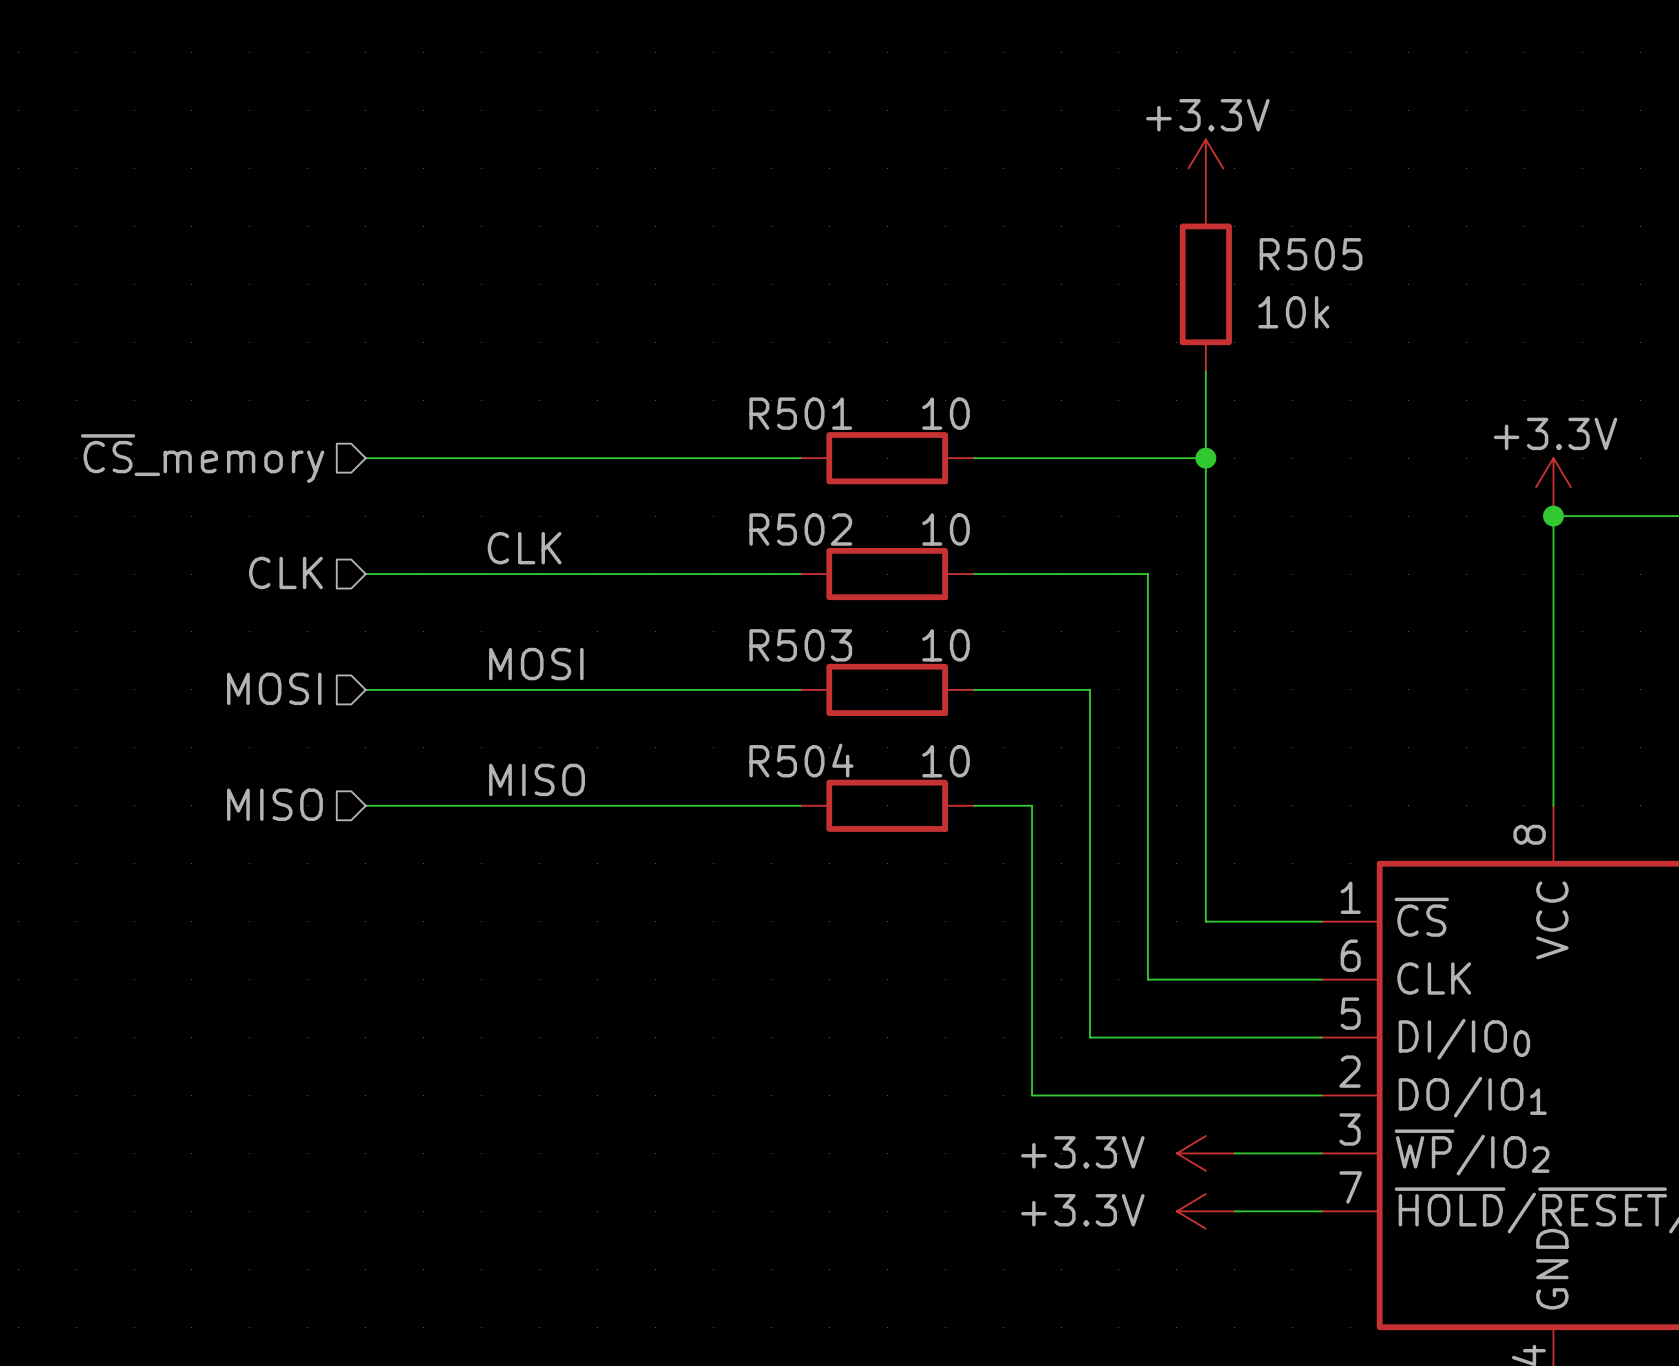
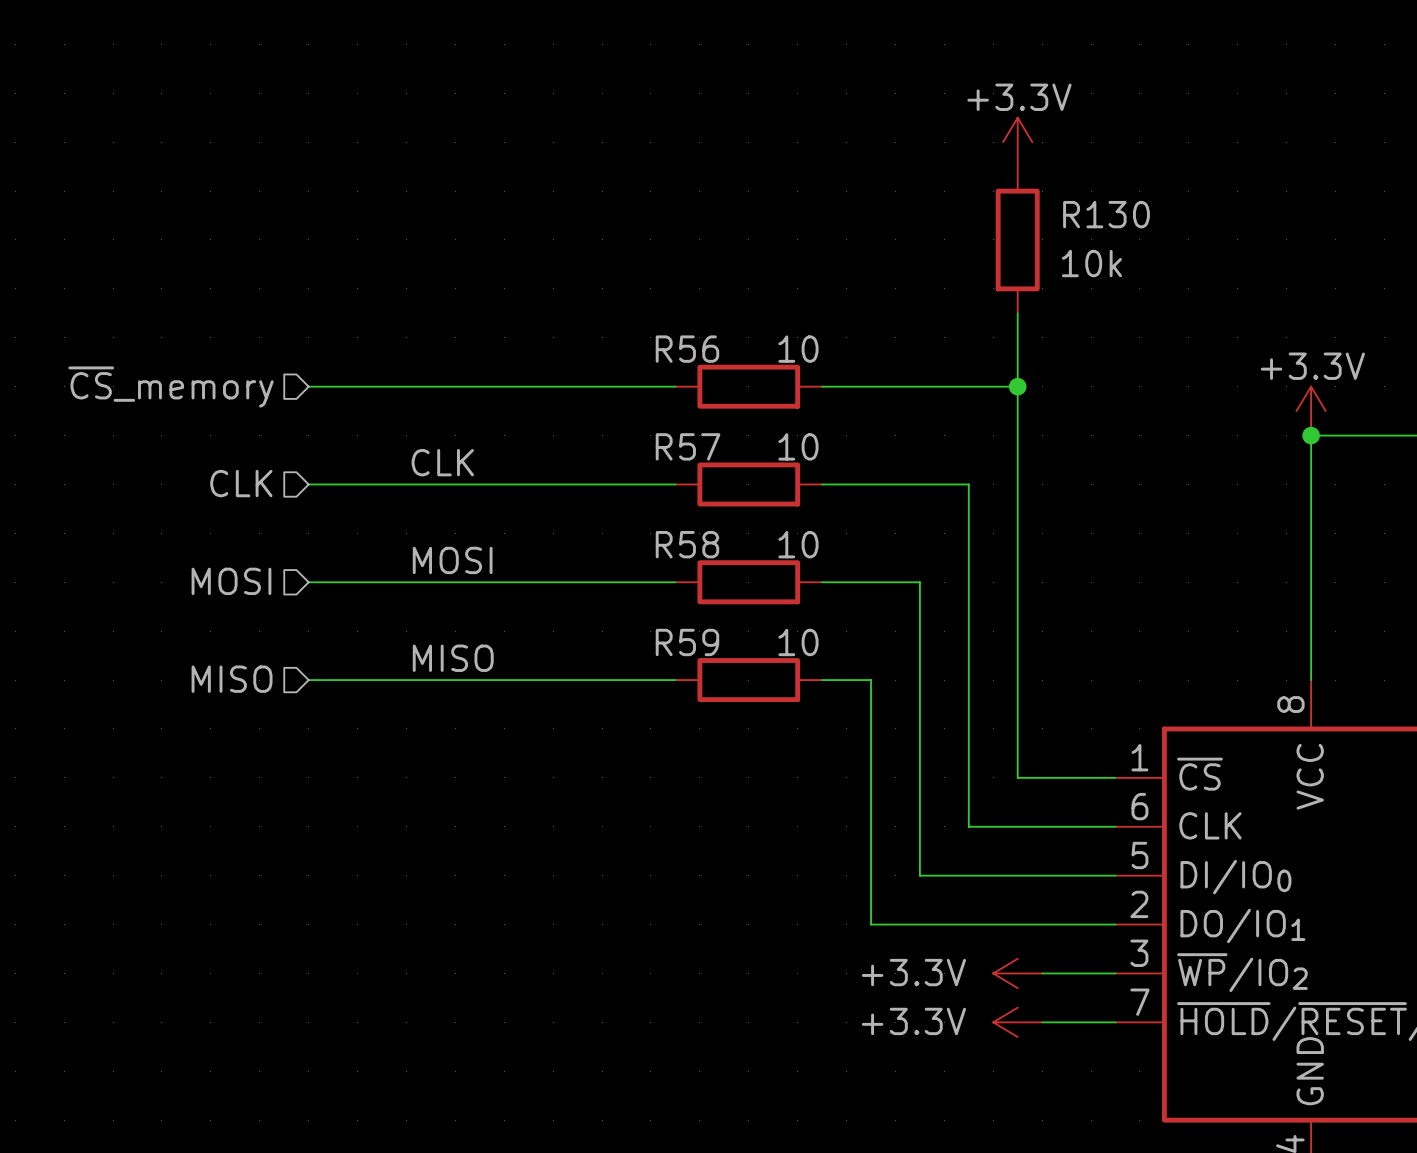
R505 name: R505 (1311, 254) -> R130 (1106, 214)
R501 name: R501 (800, 413) -> R56 (687, 349)
R502 name: R502 (800, 529) -> R57 (688, 446)
R503 name: R503 (800, 645) -> R58 (687, 544)
R504 name: R504 (801, 760) -> R59 (687, 642)

